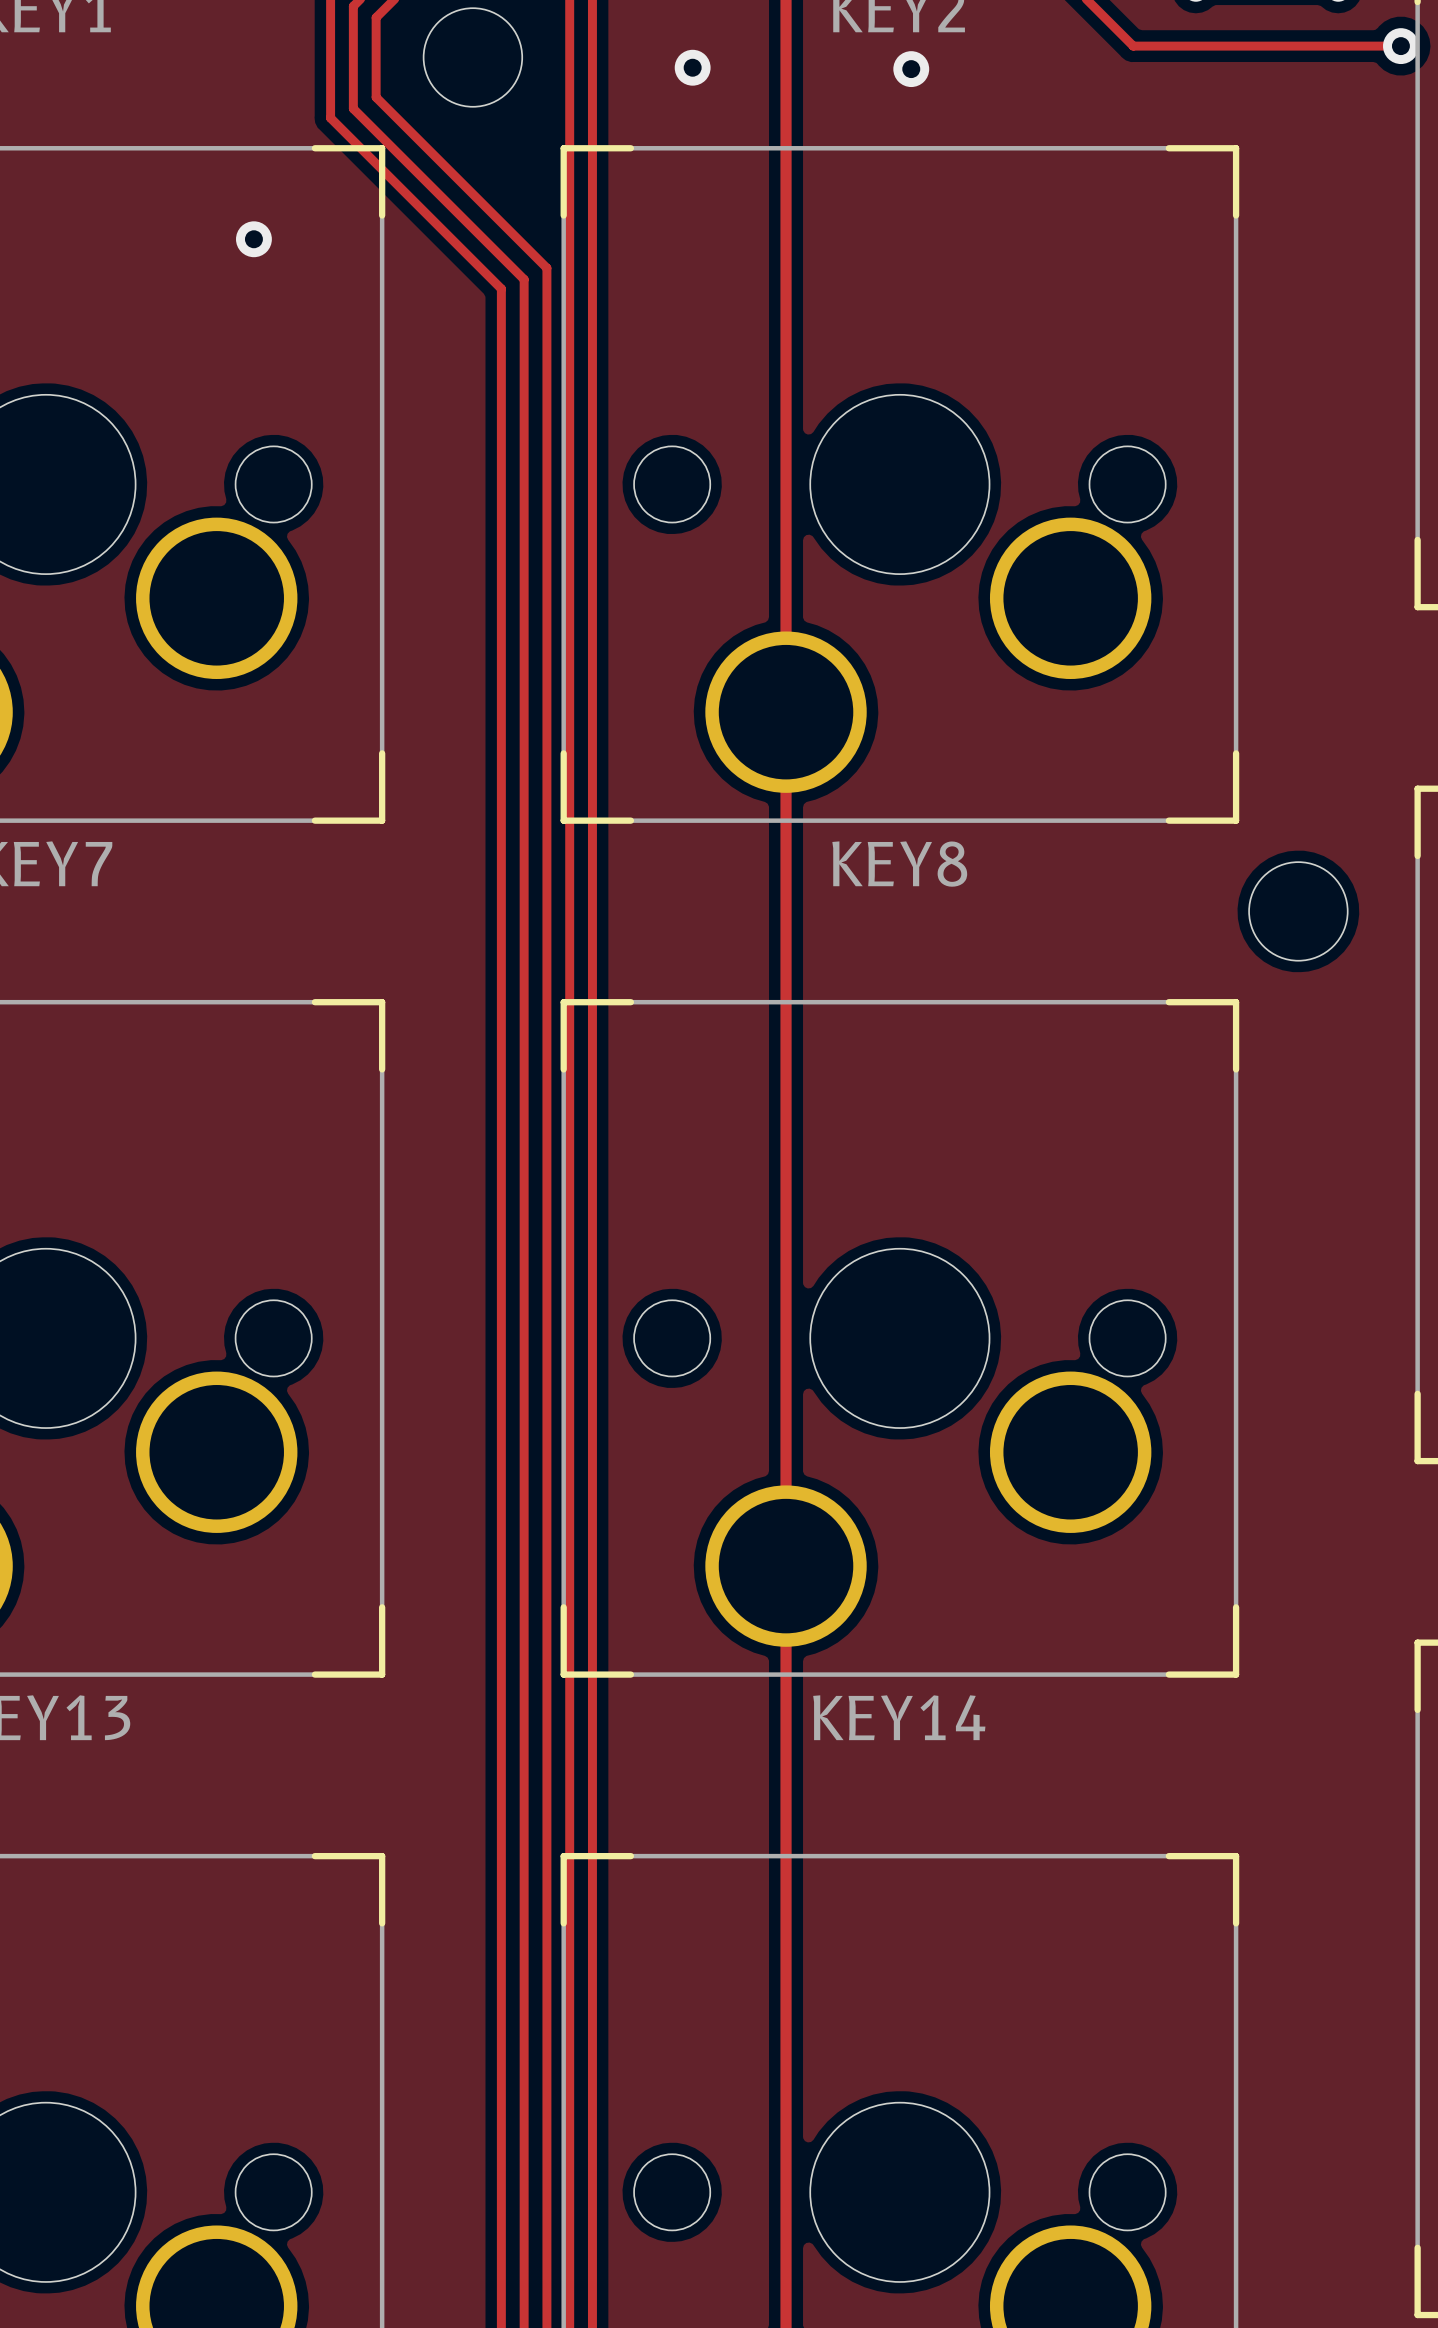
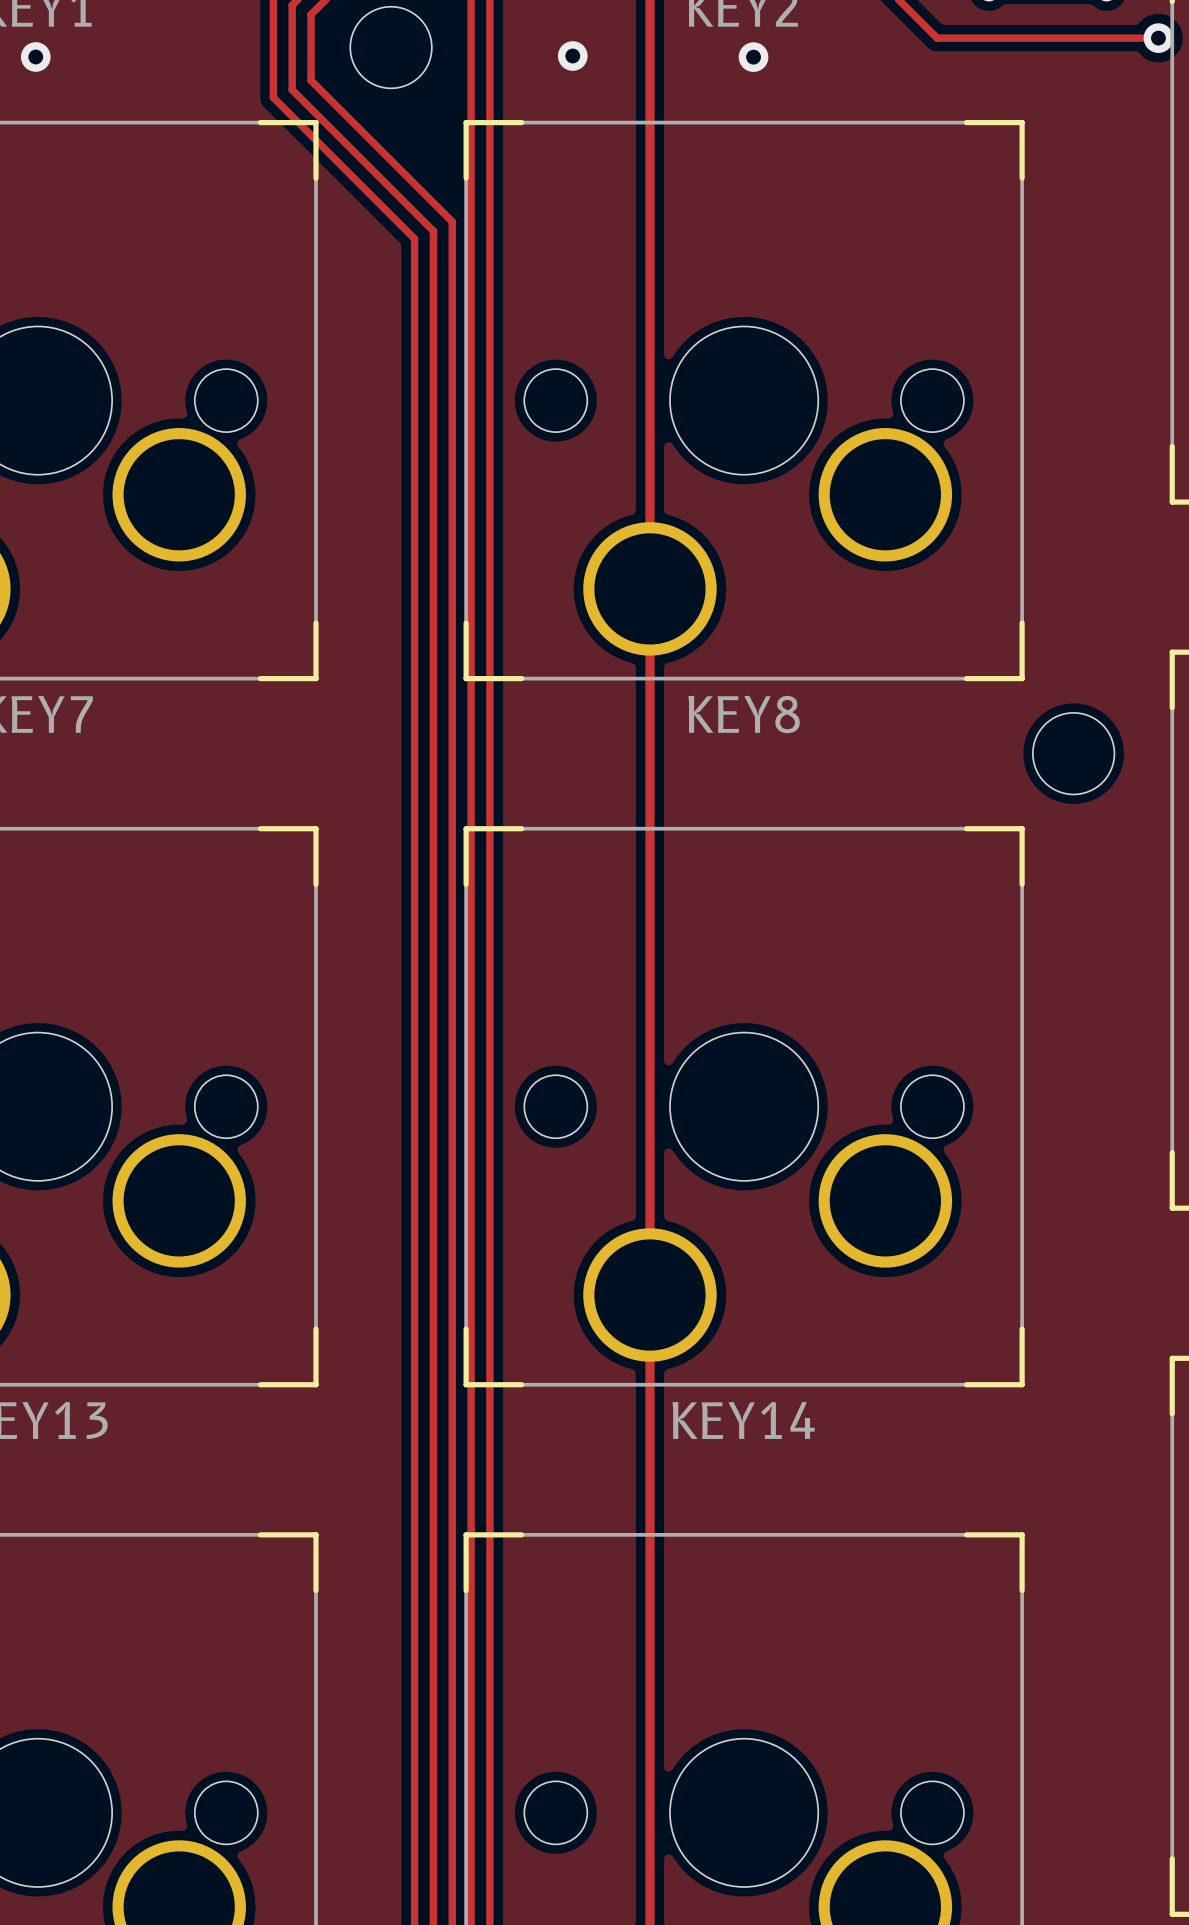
via: none -> (35, 56)
via: (253, 239) -> none

